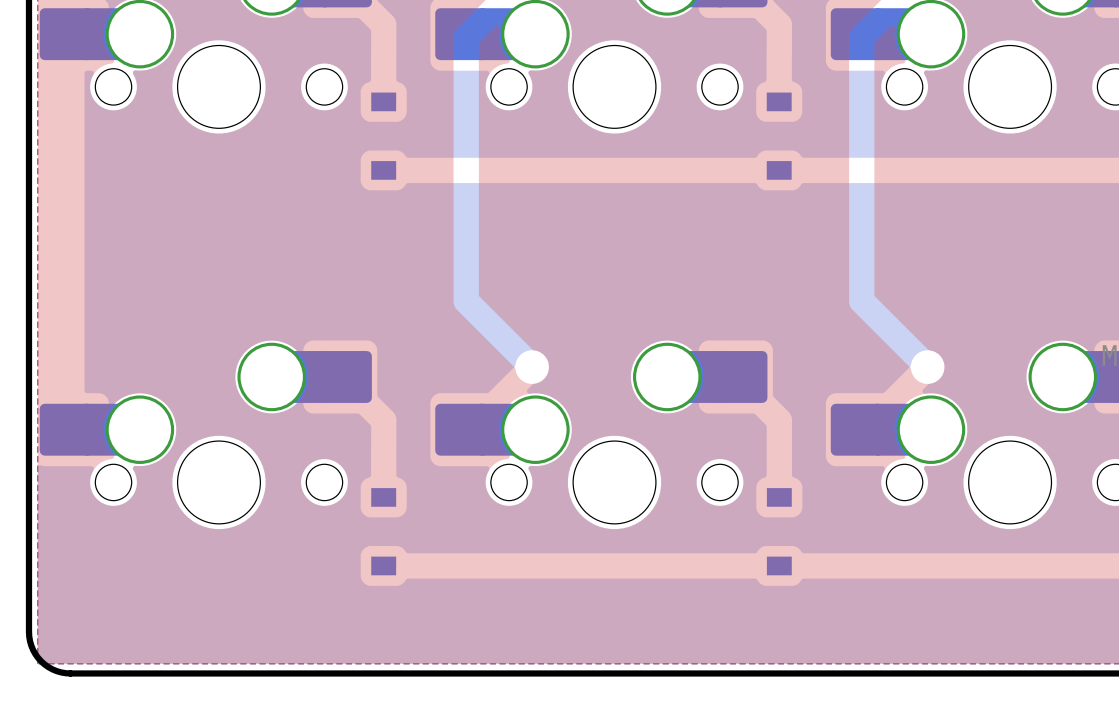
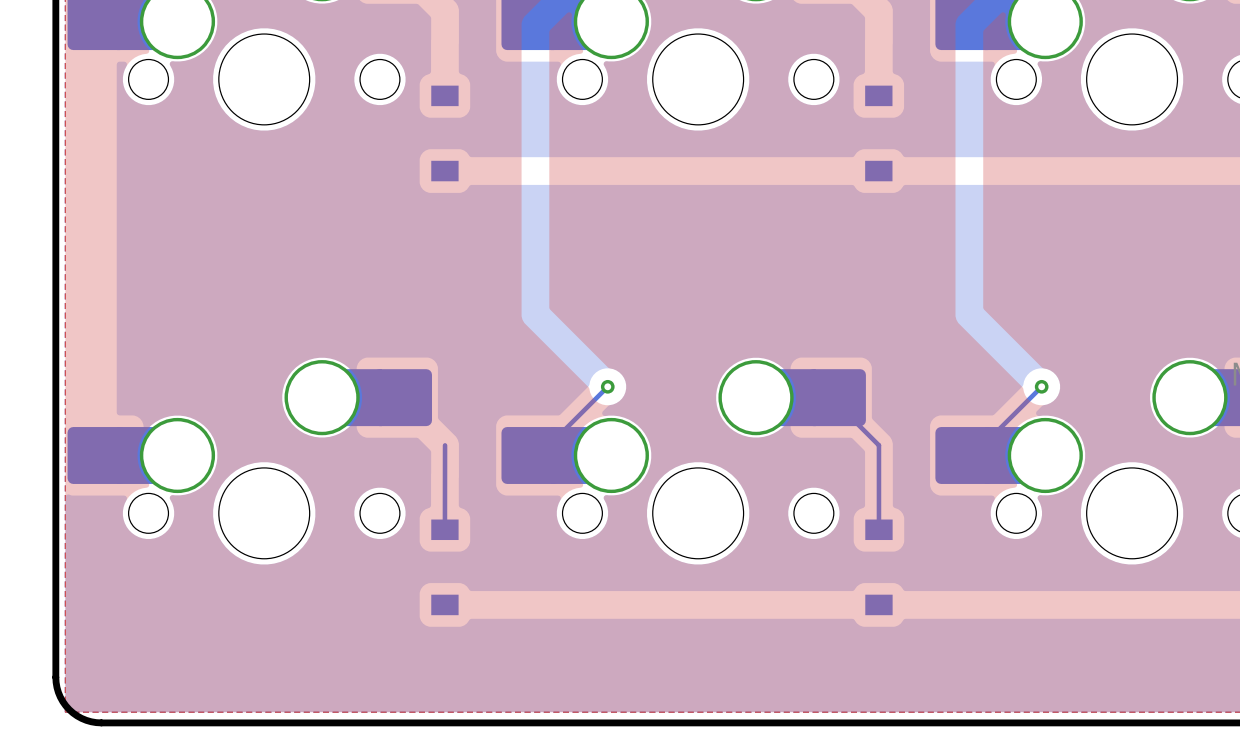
bottom track: none -> (607, 386) (539, 455) (536, 455)
via: none -> (607, 386)
bottom track: none -> (1041, 386) (972, 455) (970, 455)
via: none -> (1041, 386)
bottom track: none -> (831, 397) (878, 445) (878, 529)
bottom track: none -> (445, 445) (444, 529)

